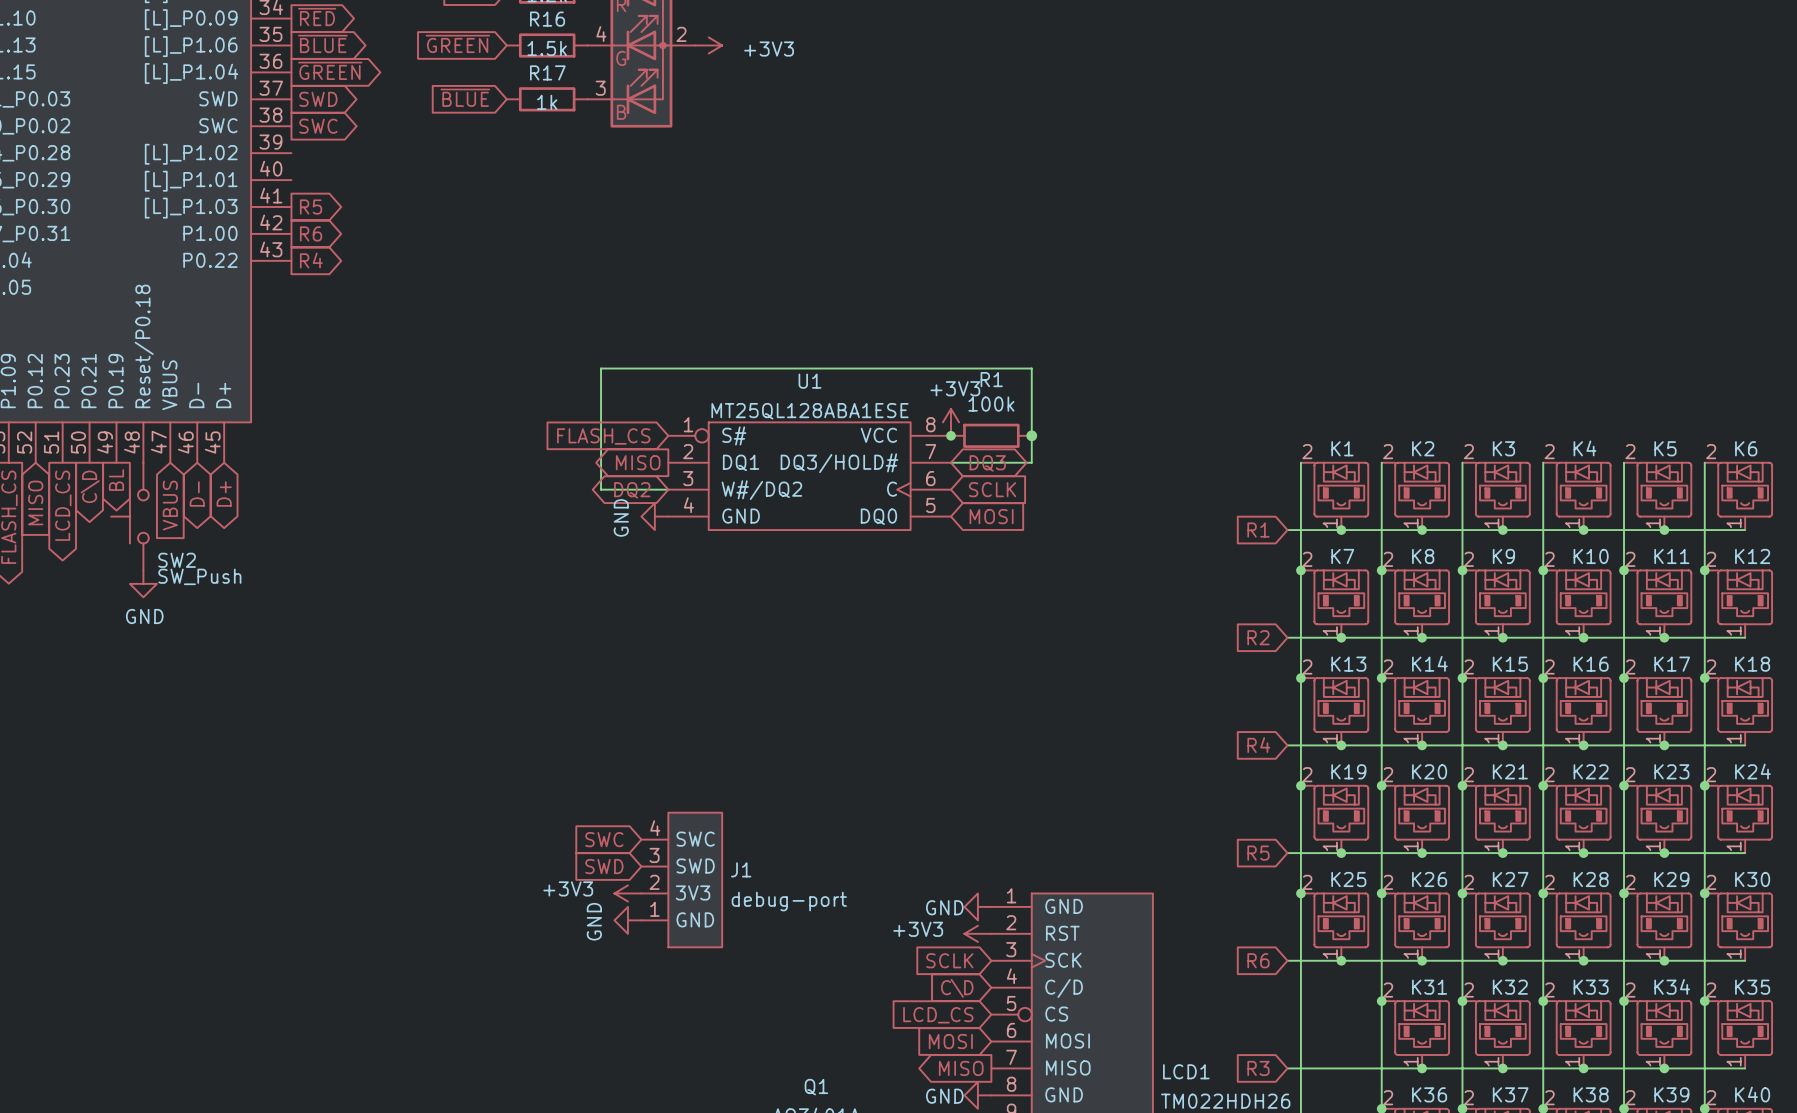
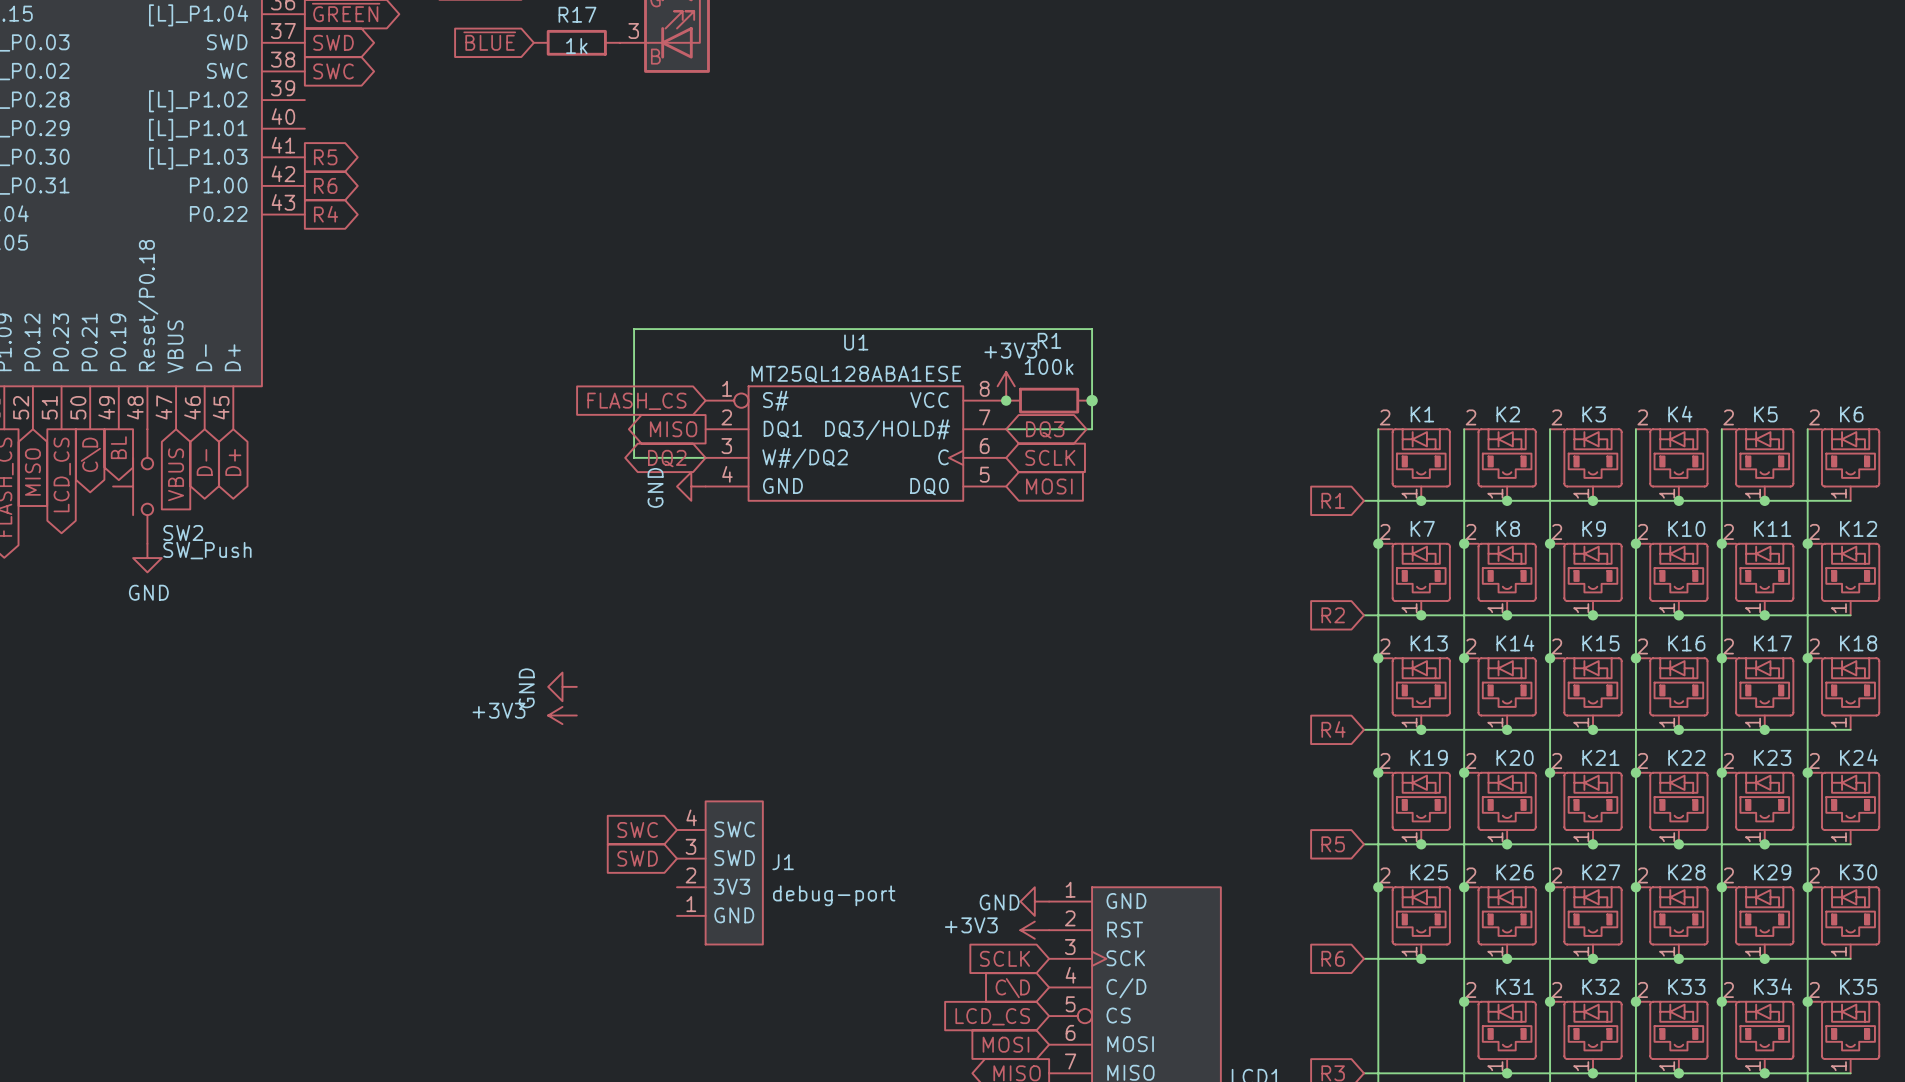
power symbol position: +3V3 (627, 893) -> +3V3 (562, 715)
power symbol position: GND (627, 920) -> GND (562, 686)

